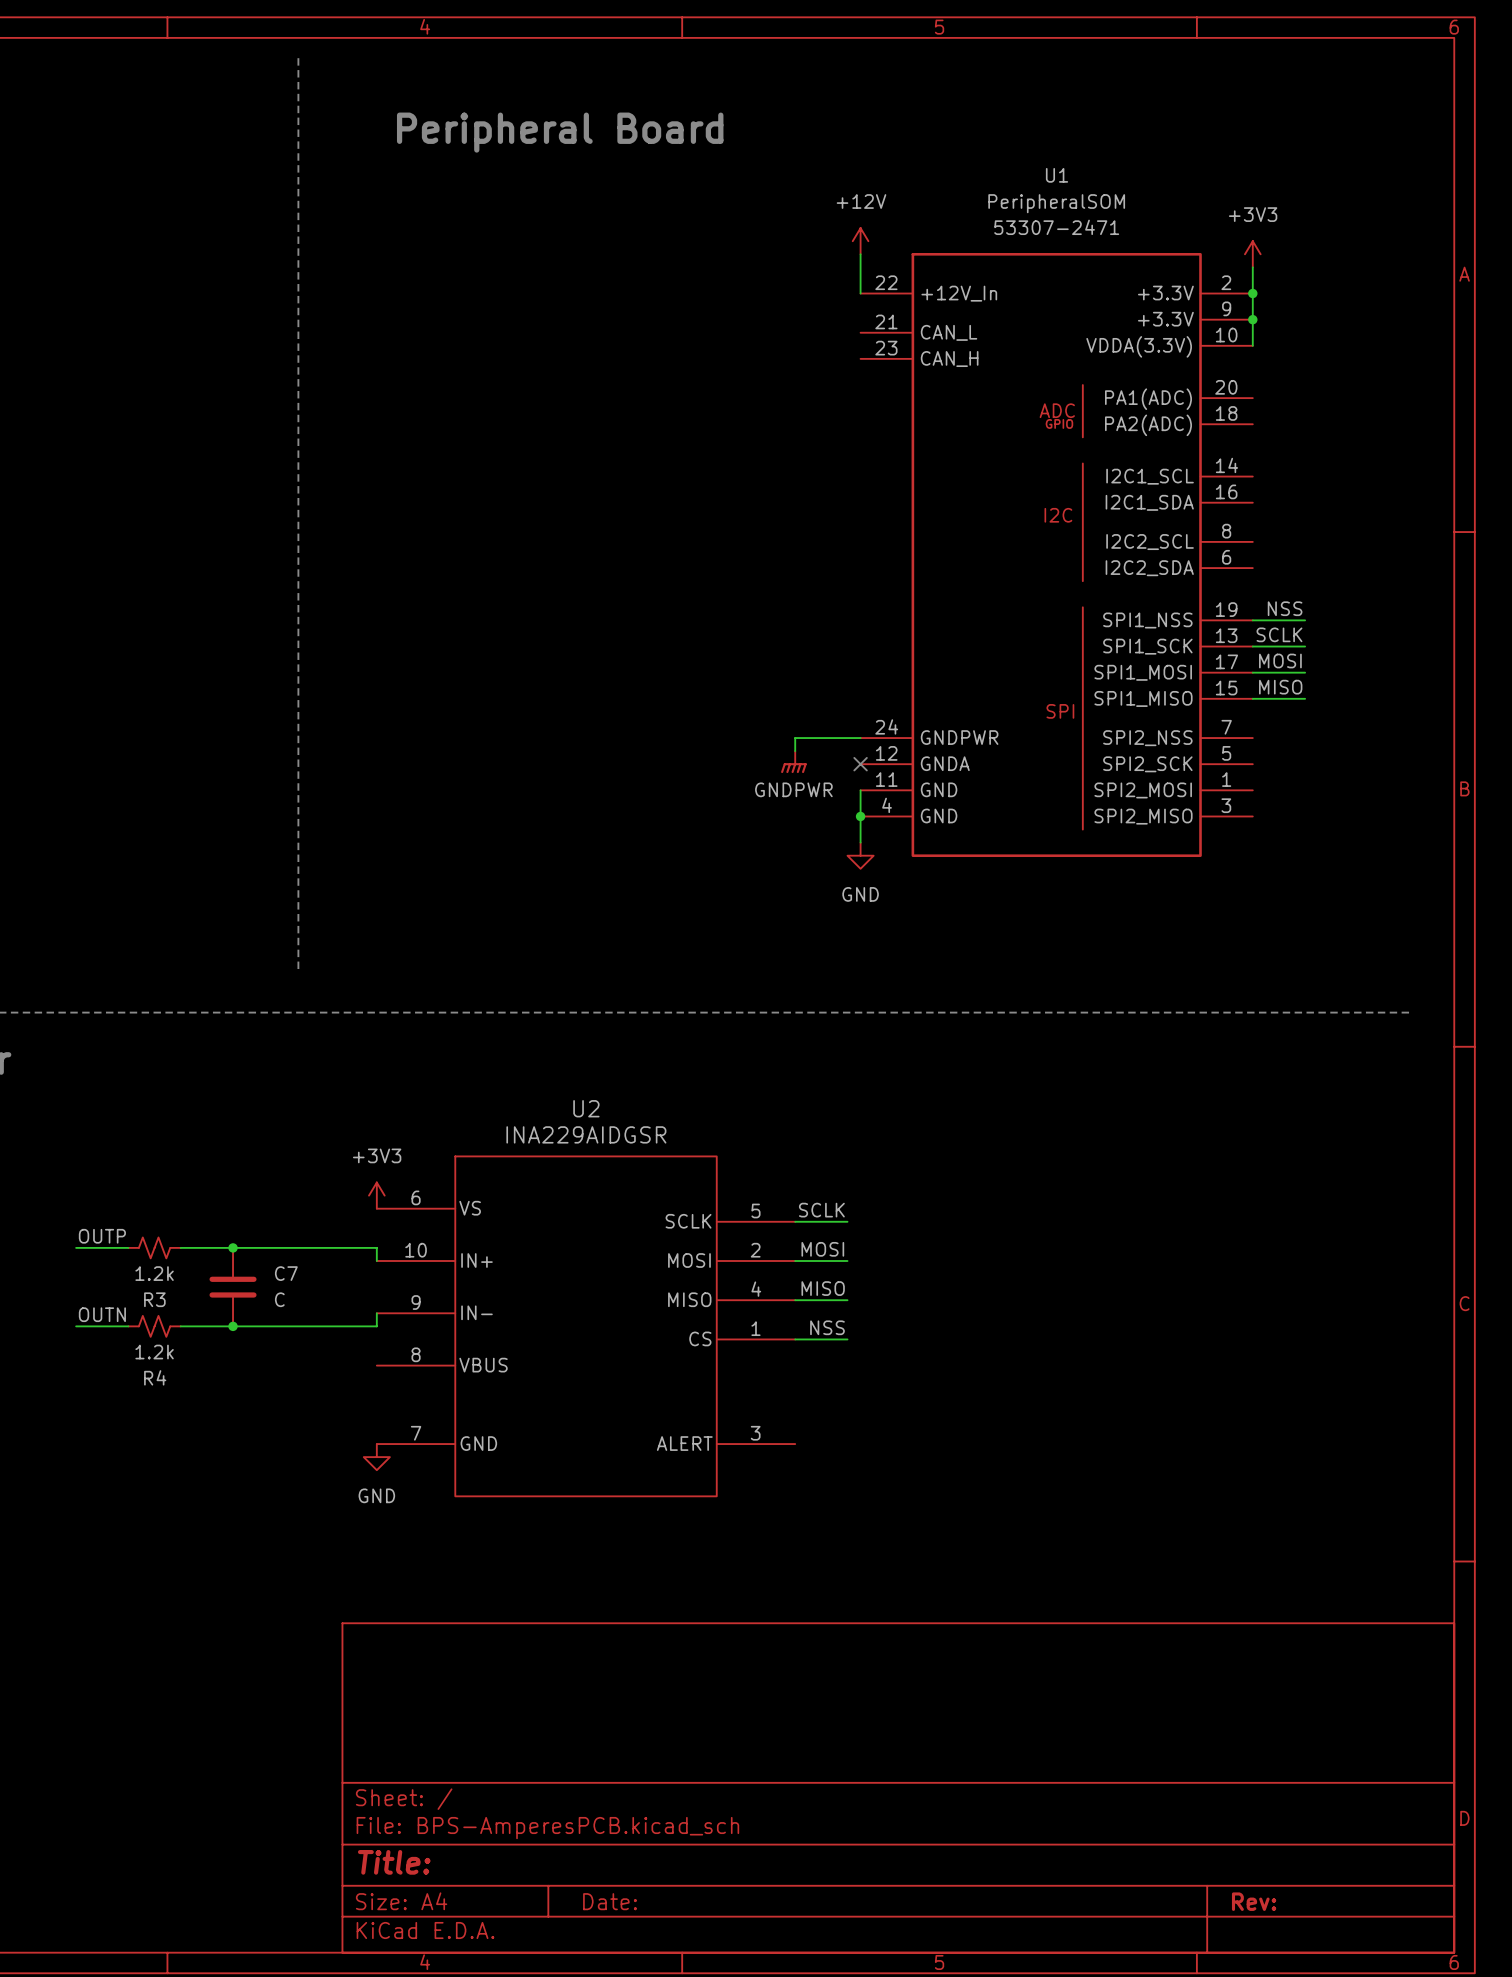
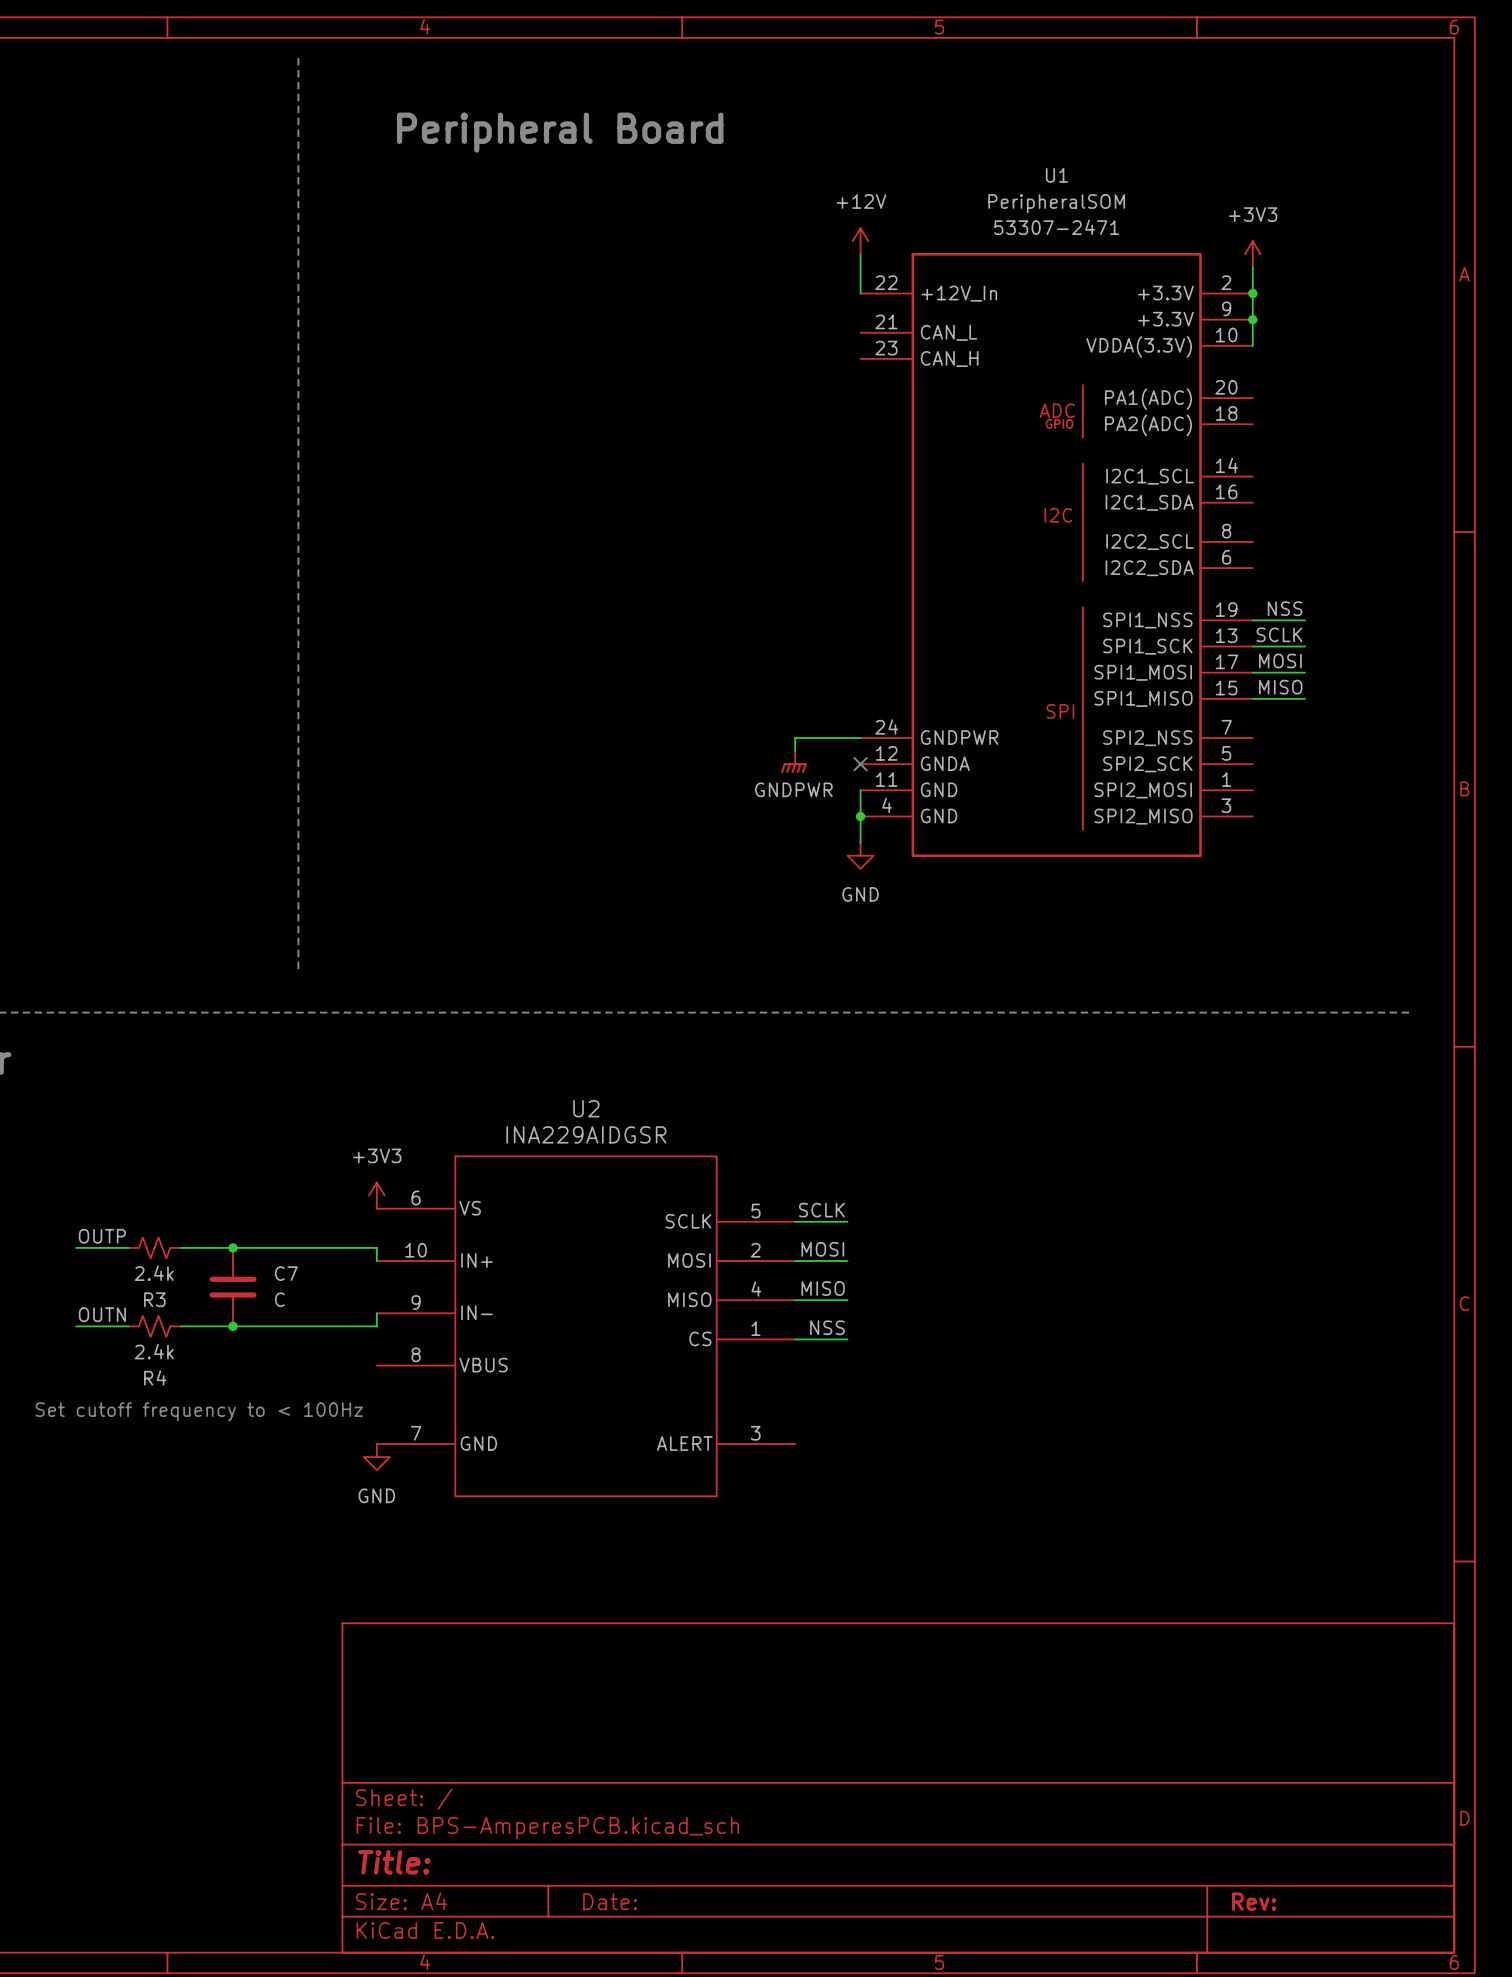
R3 value: 1.2k (154, 1273) -> 2.4k (154, 1273)
R4 value: 1.2k (154, 1352) -> 2.4k (154, 1351)
text: none -> Set cutoff frequency to < 100Hz (199, 1411)

